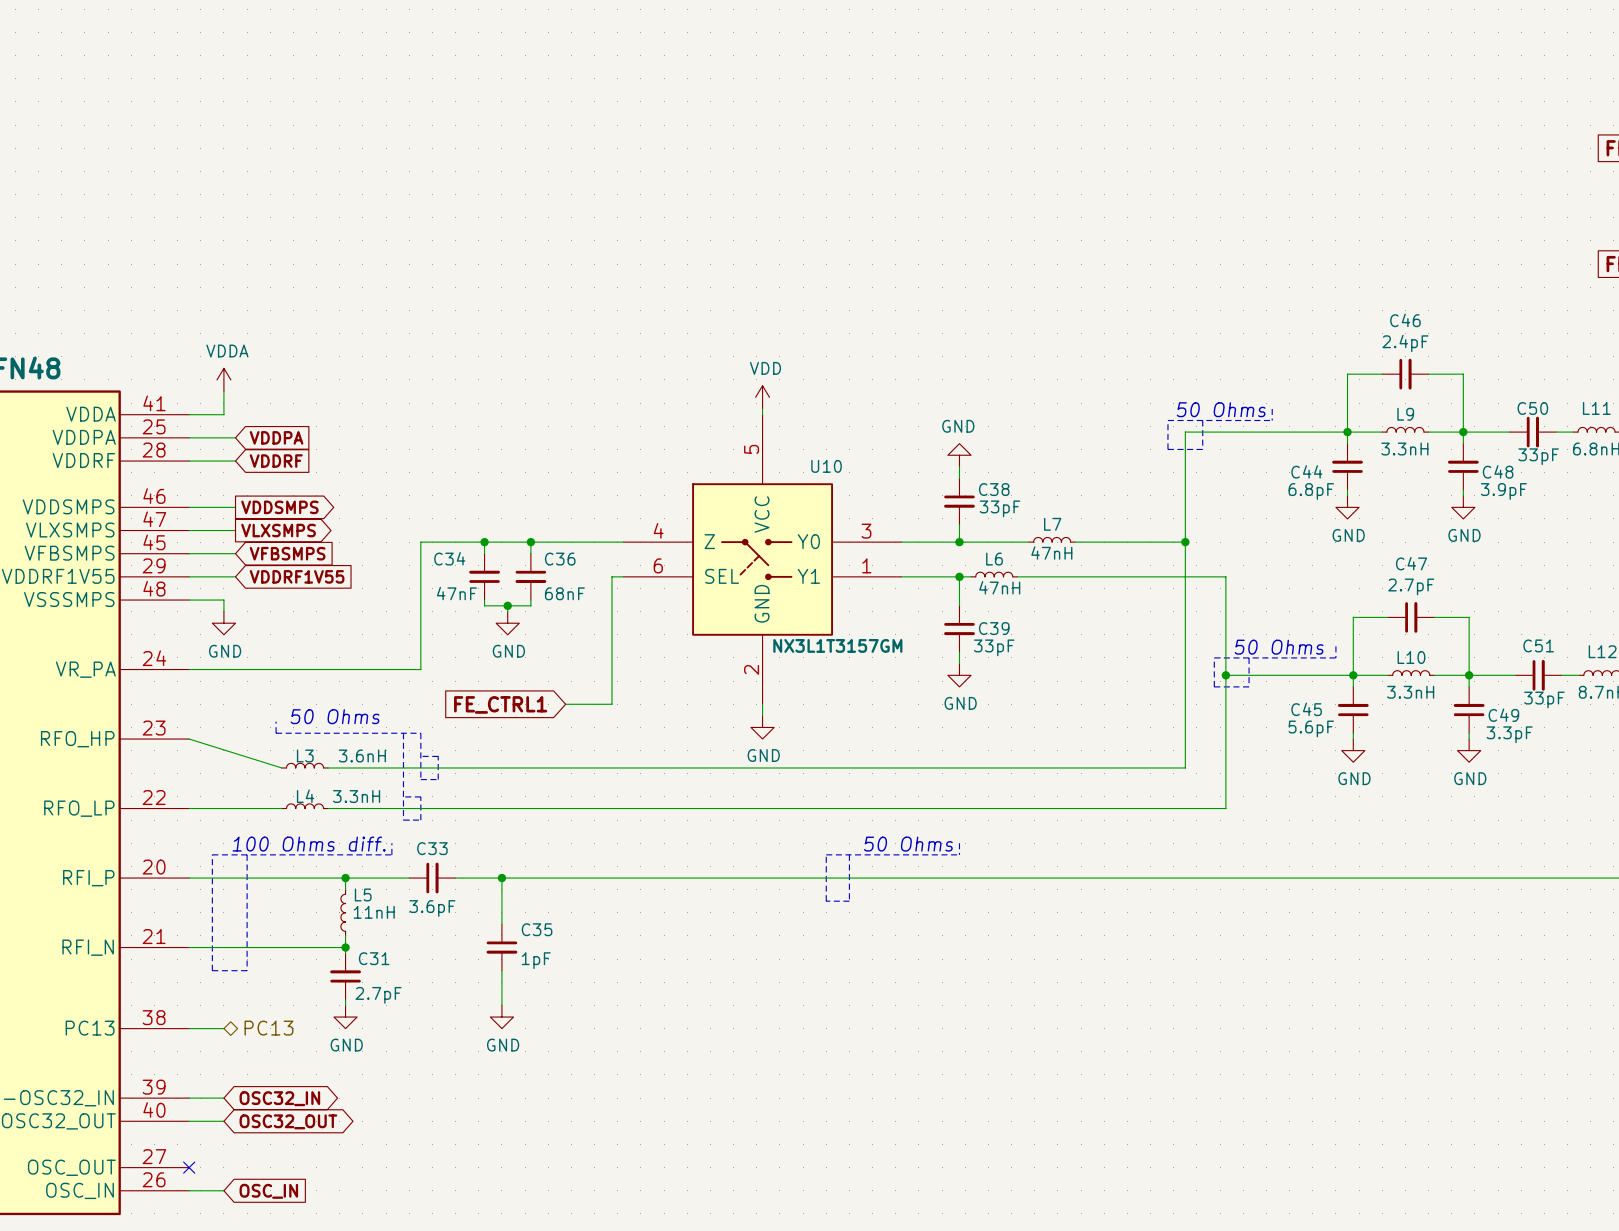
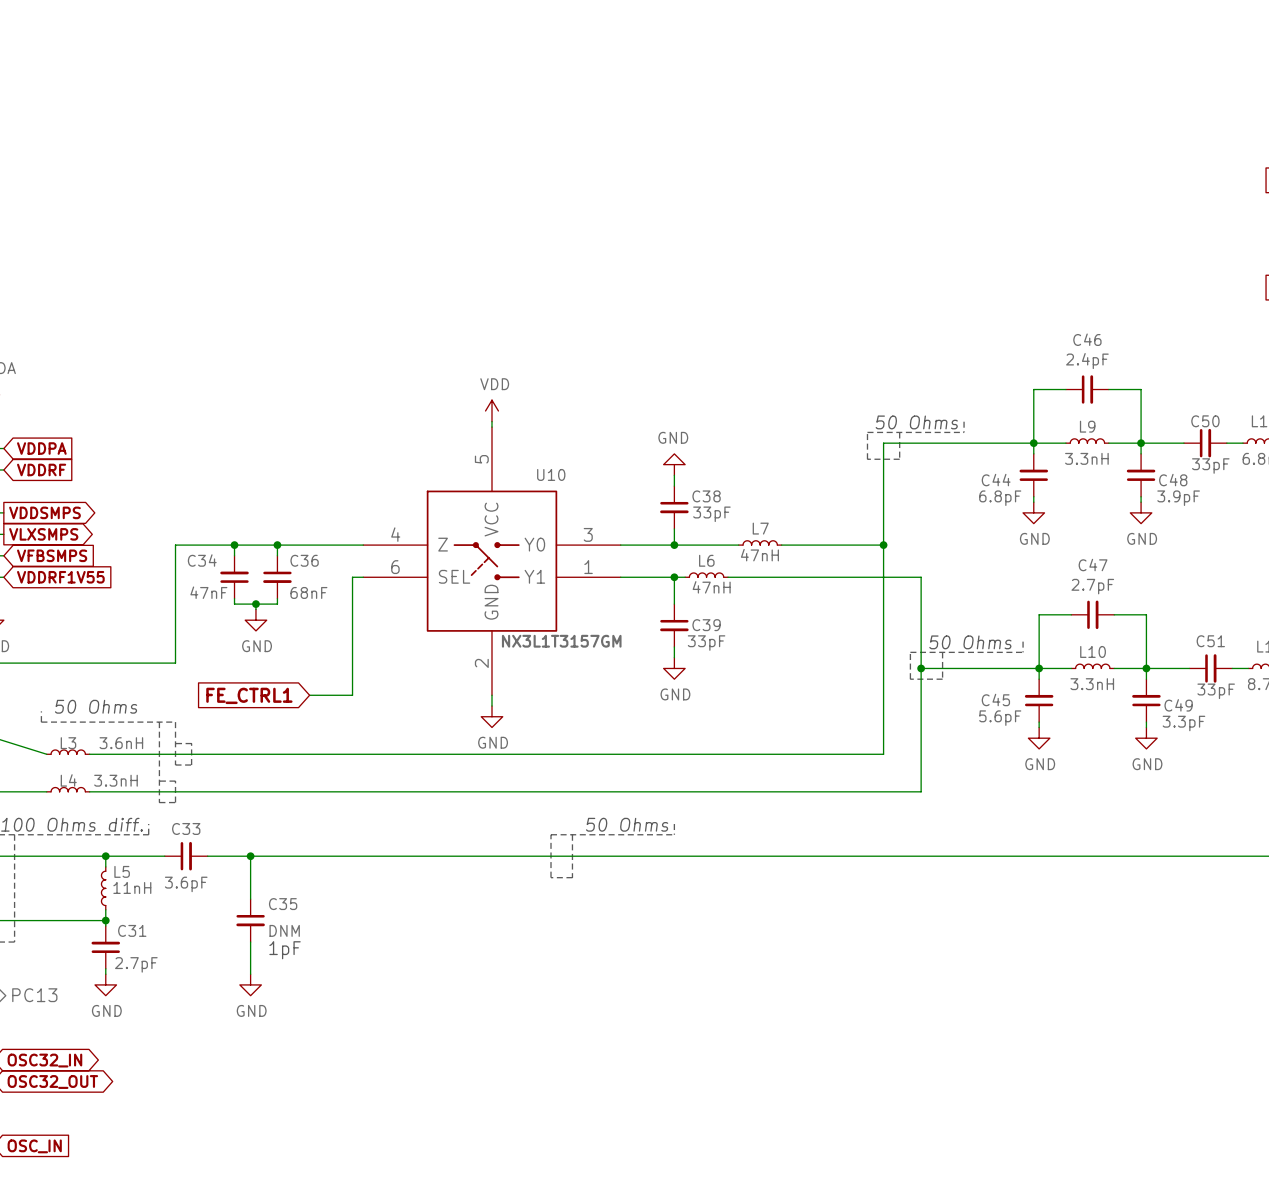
C35 value: 1pF (536, 960) -> DNM (284, 930)
text: none -> 1pF (285, 950)

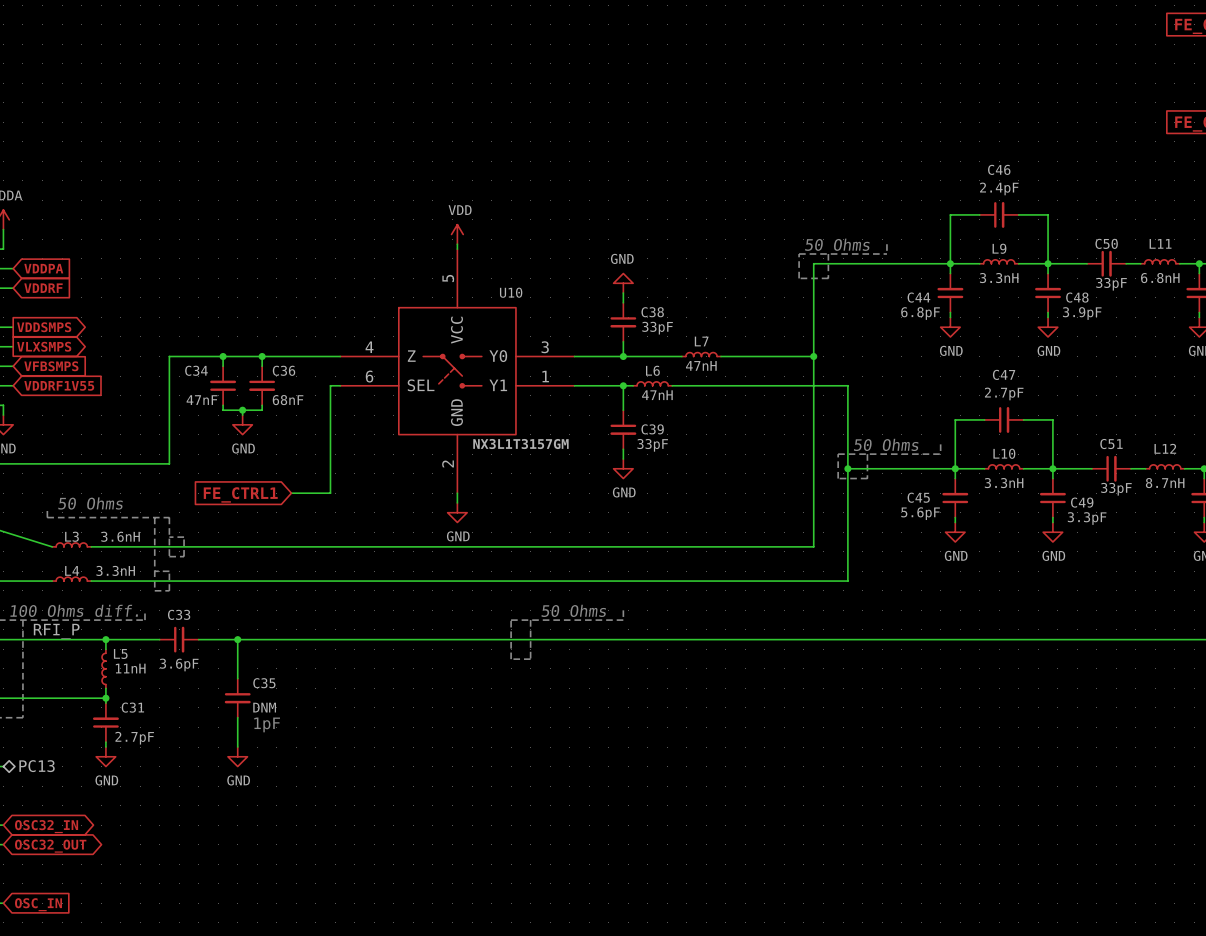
label: none -> RFI_P (56, 631)

